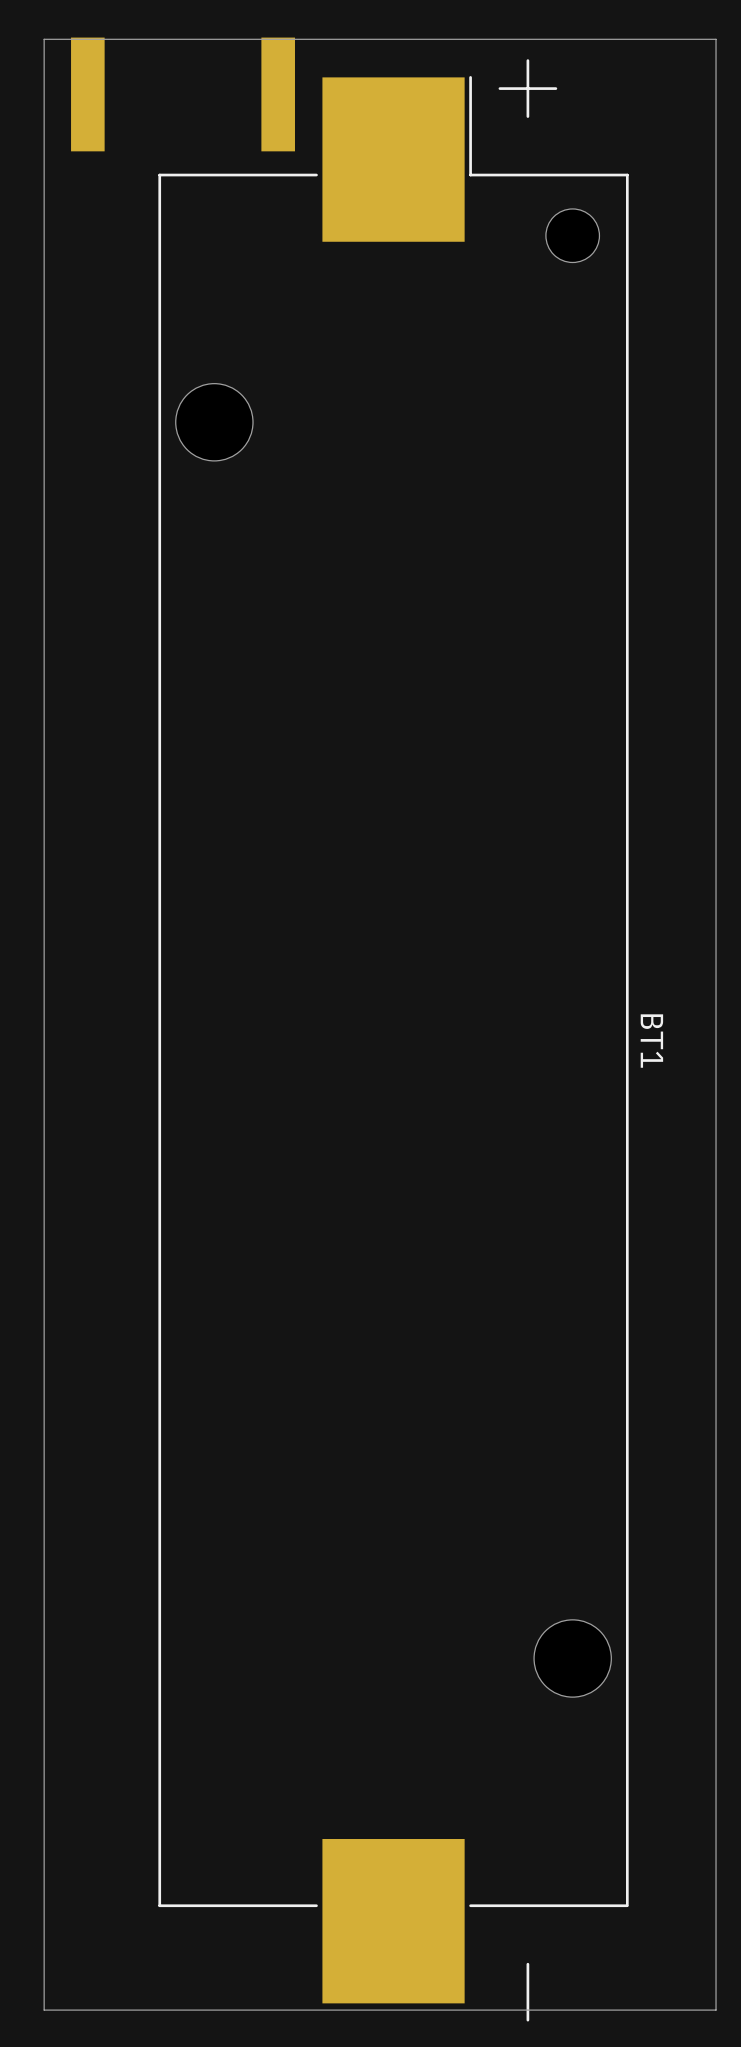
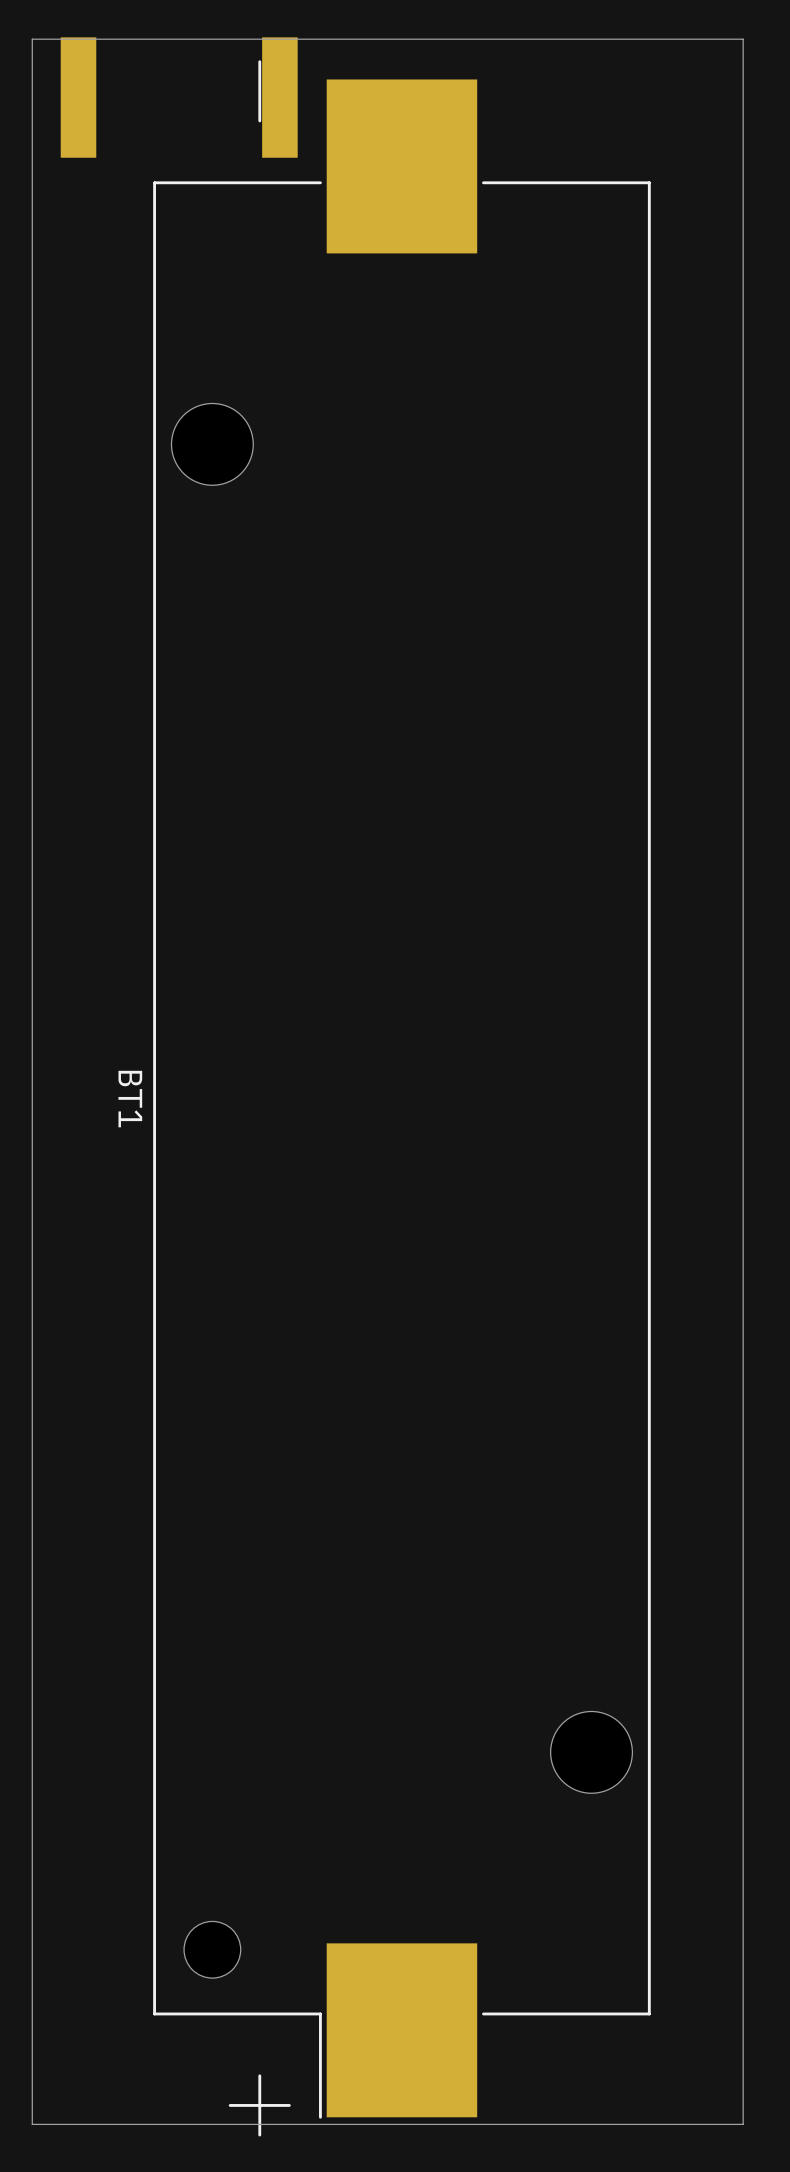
BT1 rotation: 0° (393, 1040) -> 180° (401, 1098)

